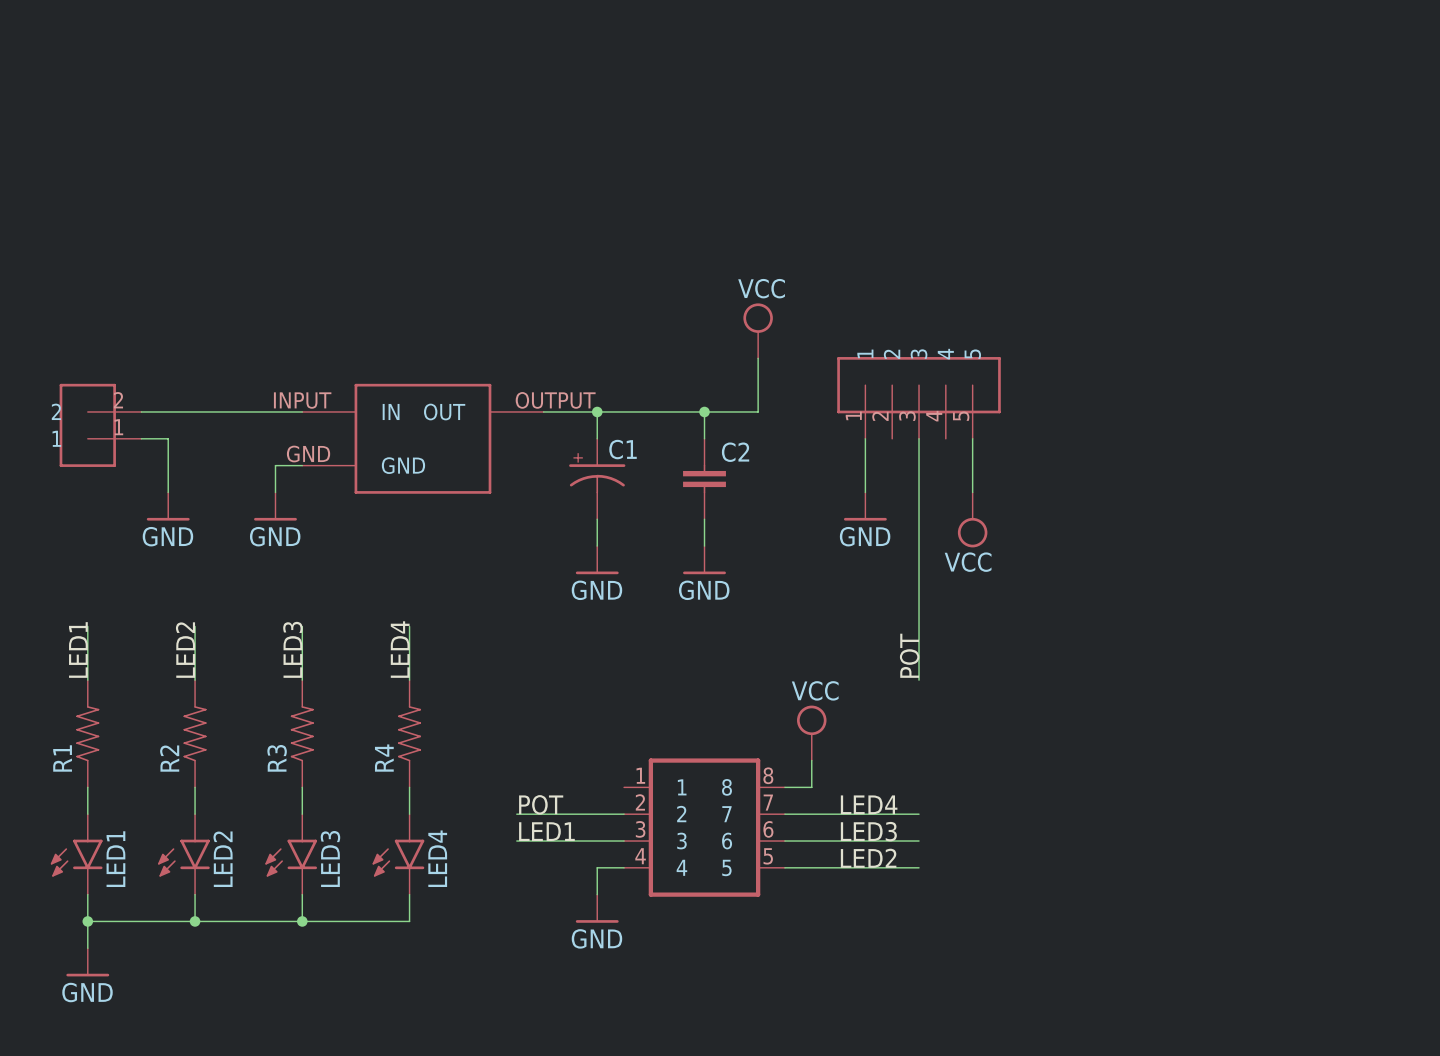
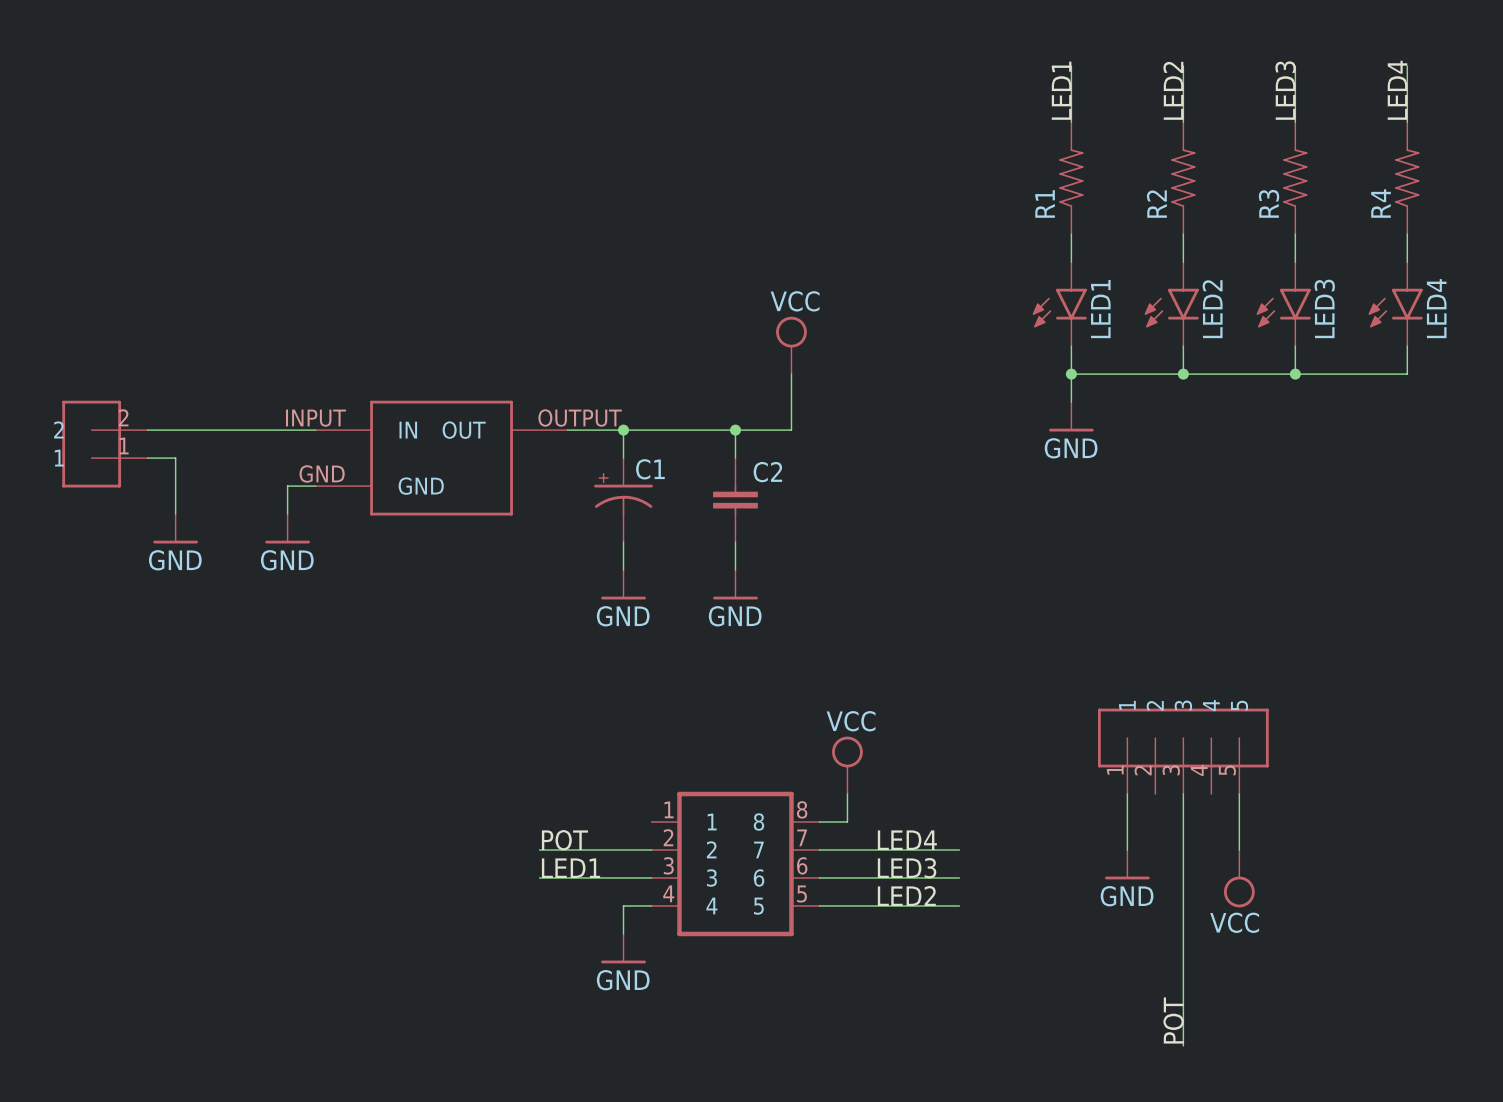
wire: none -> (1071, 66) (1071, 122)
wire: none -> (1183, 66) (1183, 122)
wire: none -> (1295, 66) (1295, 122)
wire: none -> (1407, 66) (1407, 122)
label: none -> LED1 (1061, 90)
label: none -> LED2 (1173, 90)
label: none -> LED3 (1285, 90)
label: none -> LED4 (1397, 90)
wire: none -> (1071, 234) (1071, 262)
wire: none -> (1183, 234) (1183, 262)
wire: none -> (1295, 234) (1295, 262)
wire: none -> (1407, 234) (1407, 262)
wire: none -> (1183, 346) (1183, 374)
wire: none -> (1295, 346) (1295, 374)
wire: none -> (1407, 346) (1407, 374) (1071, 374)
junction: none -> (1071, 374)
junction: none -> (1183, 374)
junction: none -> (1295, 374)
part: (919, 397) -> none
power symbol: none -> GND (1071, 416)
wire: (865, 438) (865, 492) -> none
wire: (919, 438) (919, 680) -> none
wire: (972, 438) (972, 492) -> (1071, 346) (1071, 402)
power symbol: GND (865, 506) -> none
power symbol: VCC (972, 519) -> none
wire: (87, 626) (87, 680) -> none
wire: (195, 626) (195, 680) -> none
wire: (302, 626) (302, 680) -> none
wire: (409, 626) (409, 680) -> none
label: LED1 (78, 649) -> none
label: LED3 (292, 649) -> none
label: LED4 (400, 649) -> none
label: LED2 (185, 650) -> none
label: POT (909, 655) -> none
part: none -> (1183, 751)
R1 position: (87, 733) -> (1071, 178)
R2 position: (195, 733) -> (1183, 178)
R3 position: (302, 733) -> (1295, 178)
R4 position: (409, 733) -> (1407, 178)
wire: none -> (1127, 794) (1127, 850)
wire: none -> (1183, 794) (1183, 1045)
wire: none -> (1239, 794) (1239, 850)
wire: (87, 787) (87, 814) -> none
wire: (195, 787) (195, 814) -> none
wire: (302, 787) (302, 814) -> none
wire: (409, 787) (409, 814) -> none
power symbol: none -> GND (1127, 864)
power symbol: none -> VCC (1239, 878)
LED1 position: (76, 854) -> (1059, 304)
LED2 position: (183, 854) -> (1171, 304)
LED3 position: (291, 854) -> (1283, 304)
LED4 position: (398, 854) -> (1395, 304)
wire: (87, 894) (87, 948) -> none
wire: (195, 894) (195, 921) -> none
wire: (302, 894) (302, 921) -> none
wire: (409, 894) (409, 921) (87, 921) -> none
junction: (87, 921) -> none
junction: (195, 921) -> none
junction: (302, 921) -> none
power symbol: GND (87, 962) -> none
label: none -> POT (1173, 1020)

